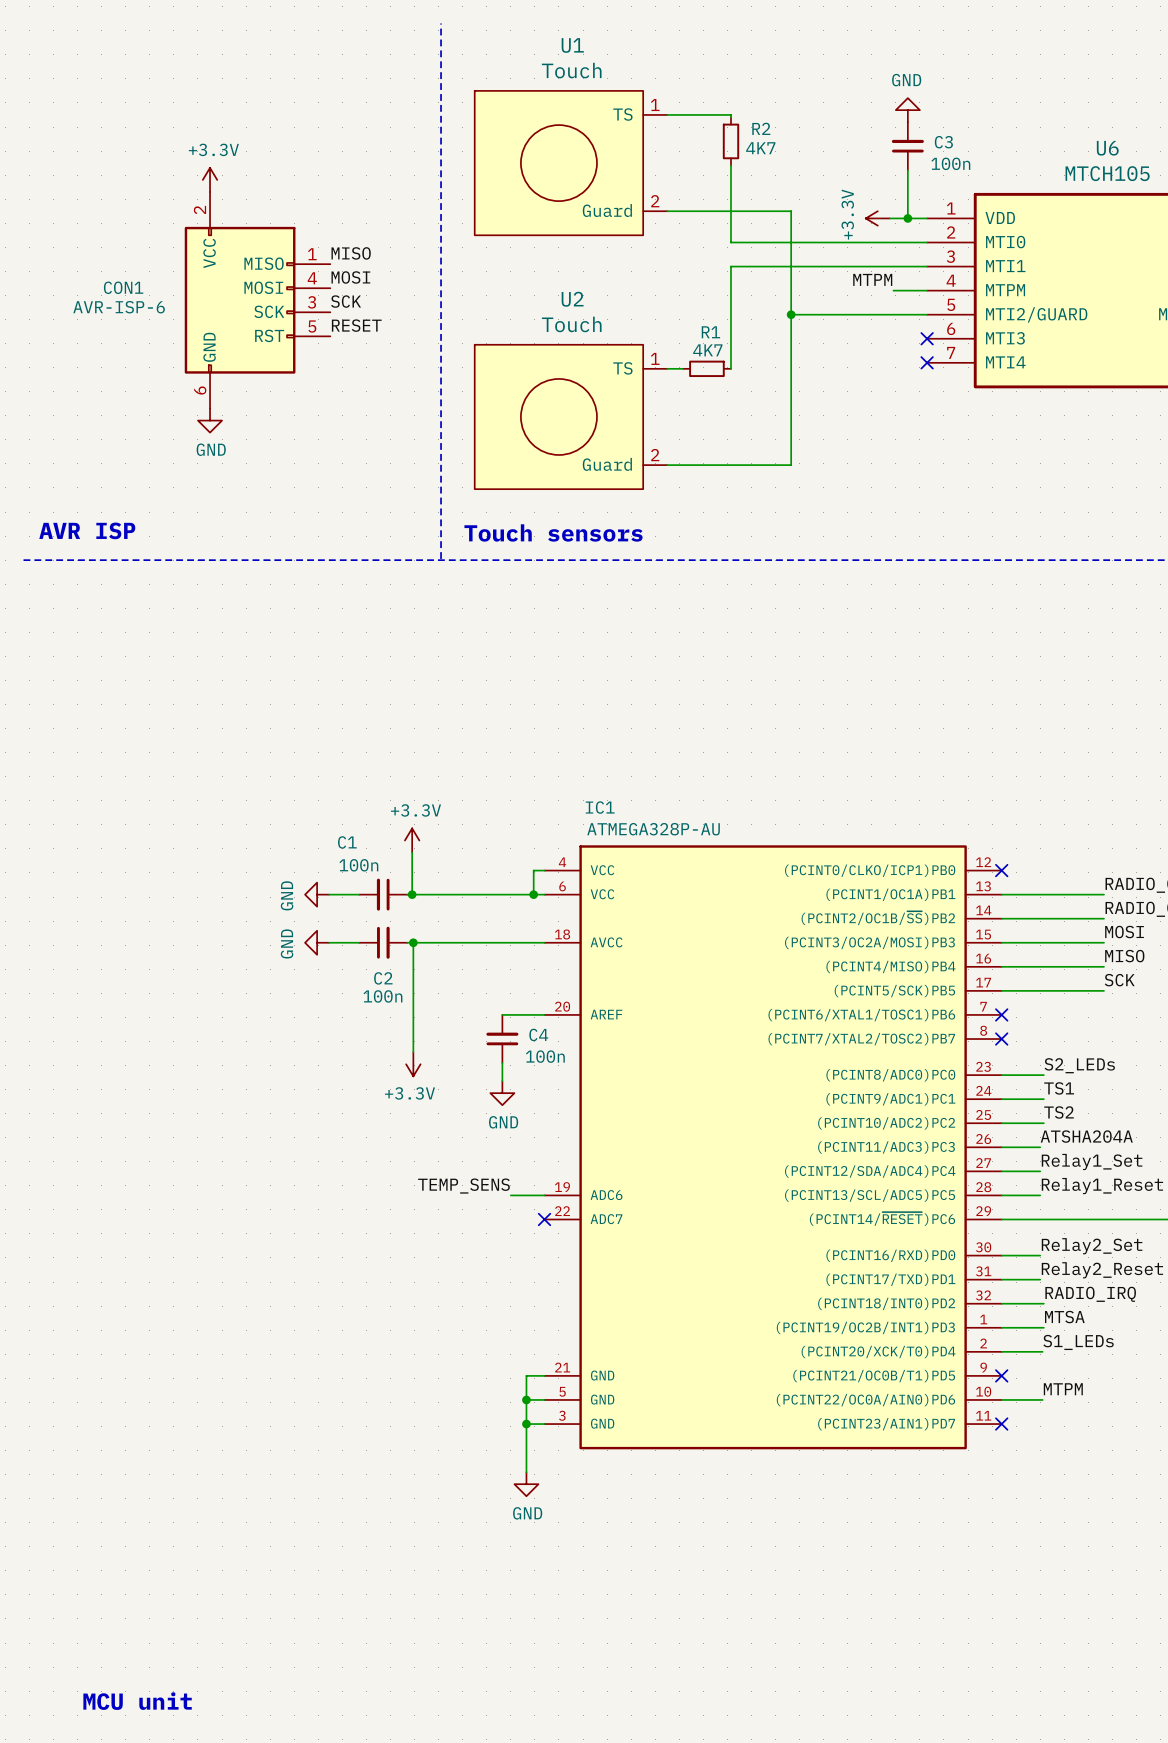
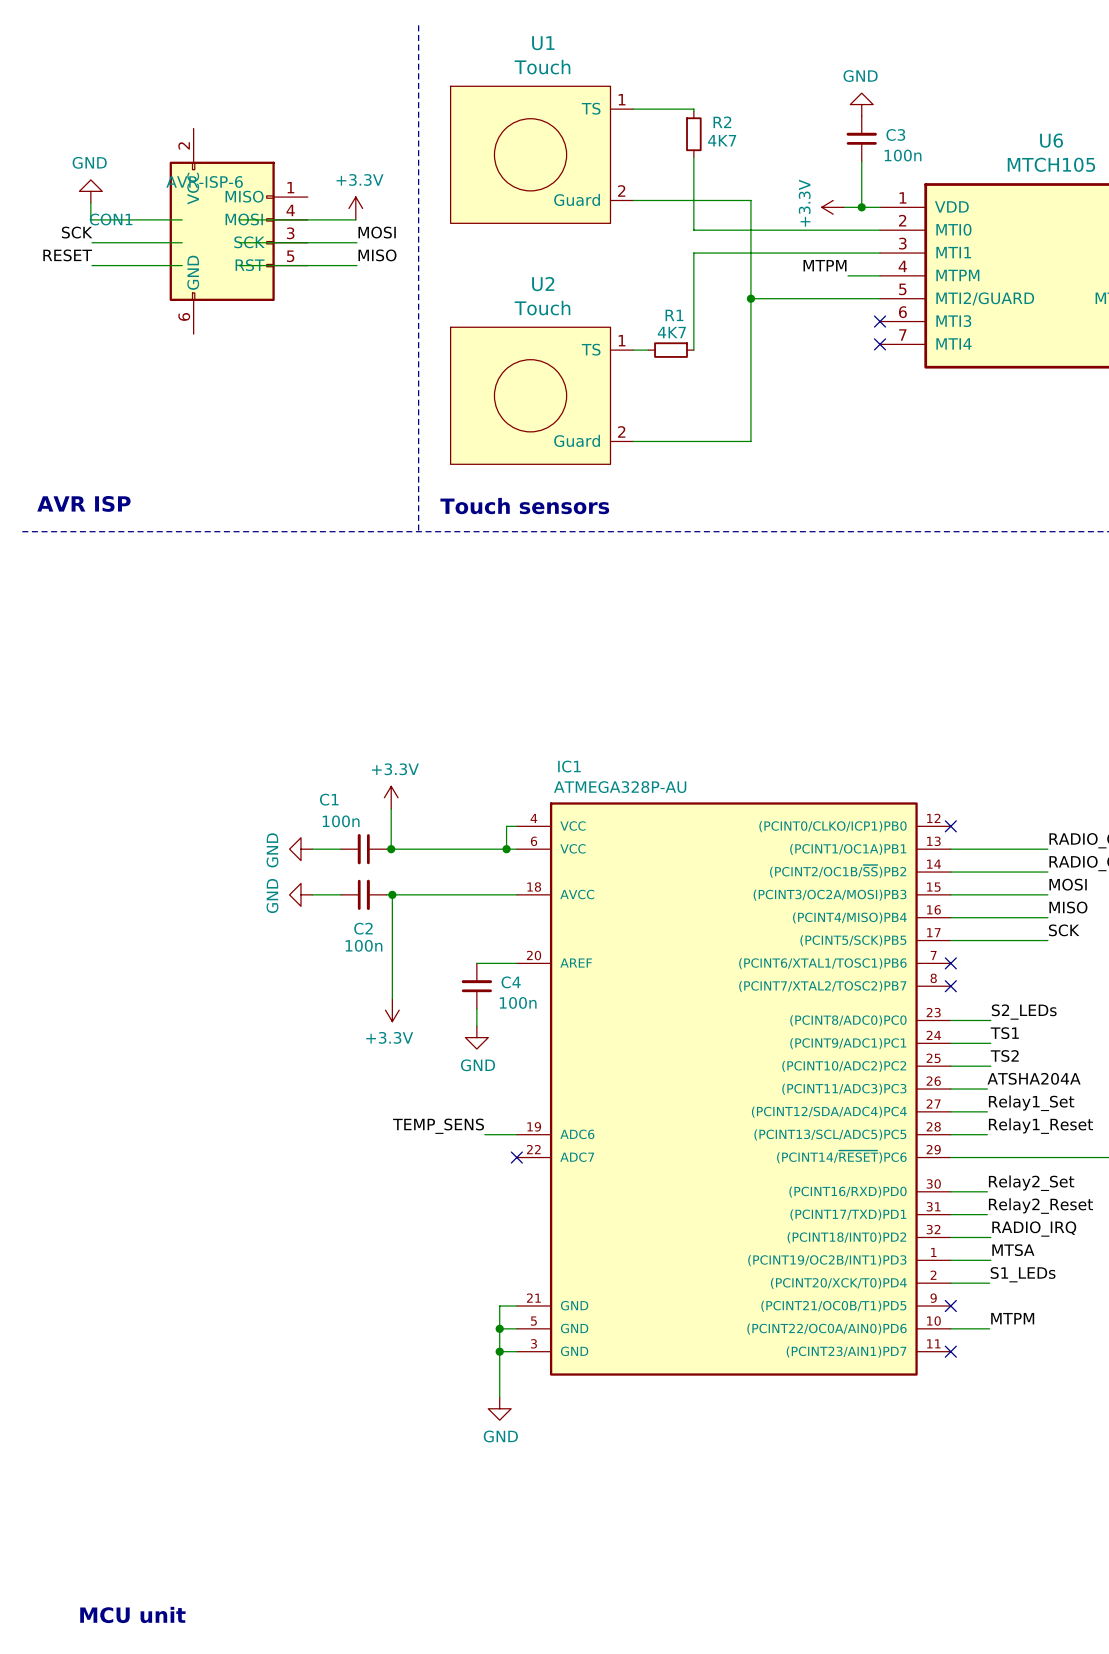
power symbol position: +3.3V (210, 179) -> +3.3V (355, 208)
power symbol: none -> GND (90, 191)
wire: none -> (90, 202) (90, 219) (182, 219)
wire: none -> (239, 219) (355, 219)
label: none -> SCK (77, 232)
label position: MISO (351, 253) -> MISO (377, 255)
wire: none -> (91, 242) (182, 242)
wire: none -> (239, 242) (356, 242)
label: none -> RESET (67, 255)
label position: MOSI (350, 277) -> MOSI (377, 232)
wire: none -> (91, 265) (182, 265)
wire: none -> (239, 265) (356, 265)
CON1 position: (257, 300) -> (238, 231)
label: SCK (346, 301) -> none
CON1 value position: AVR-ISP-6 (119, 307) -> AVR-ISP-6 (204, 181)
label: RESET (356, 325) -> none
power symbol: GND (210, 420) -> none

